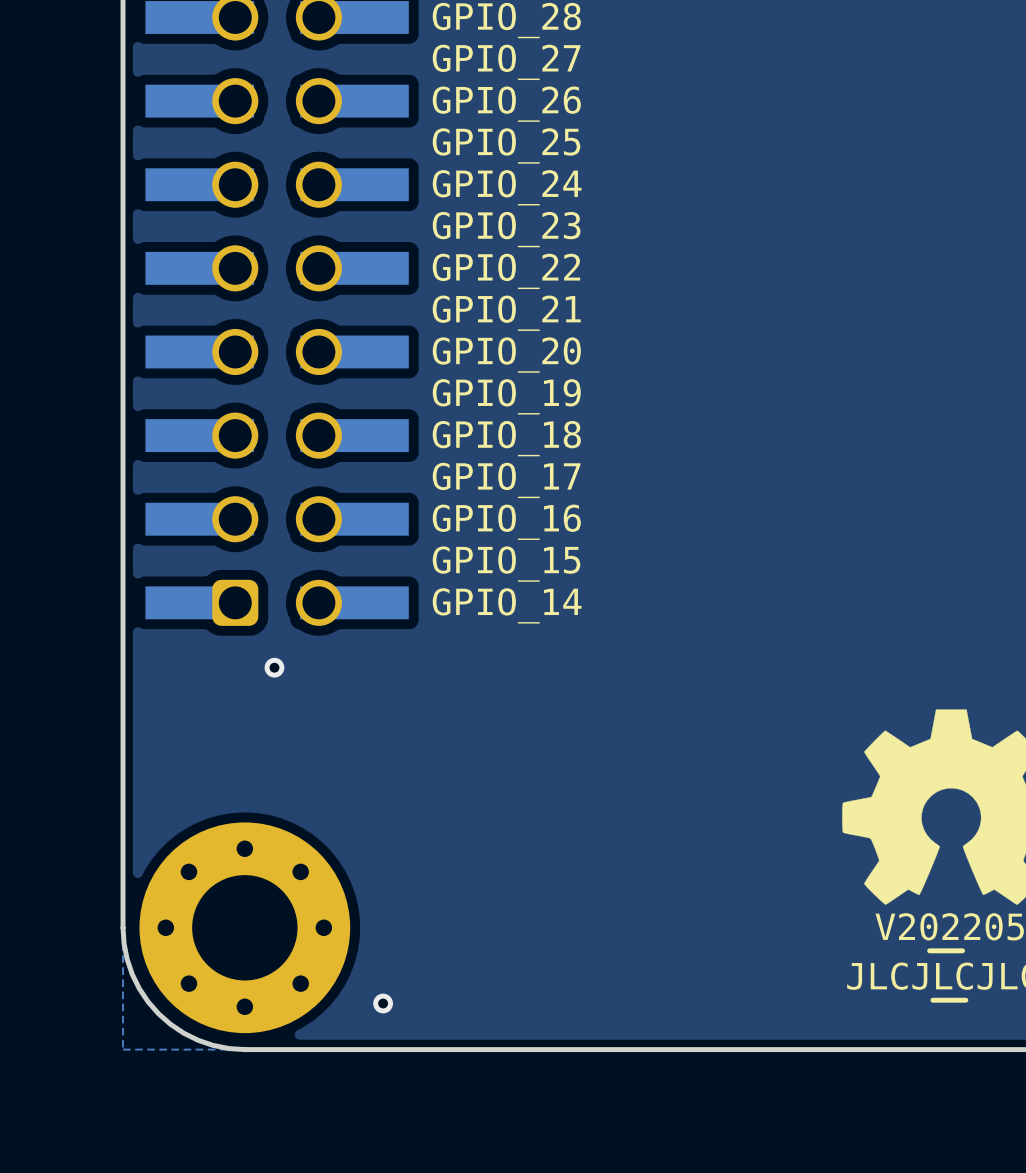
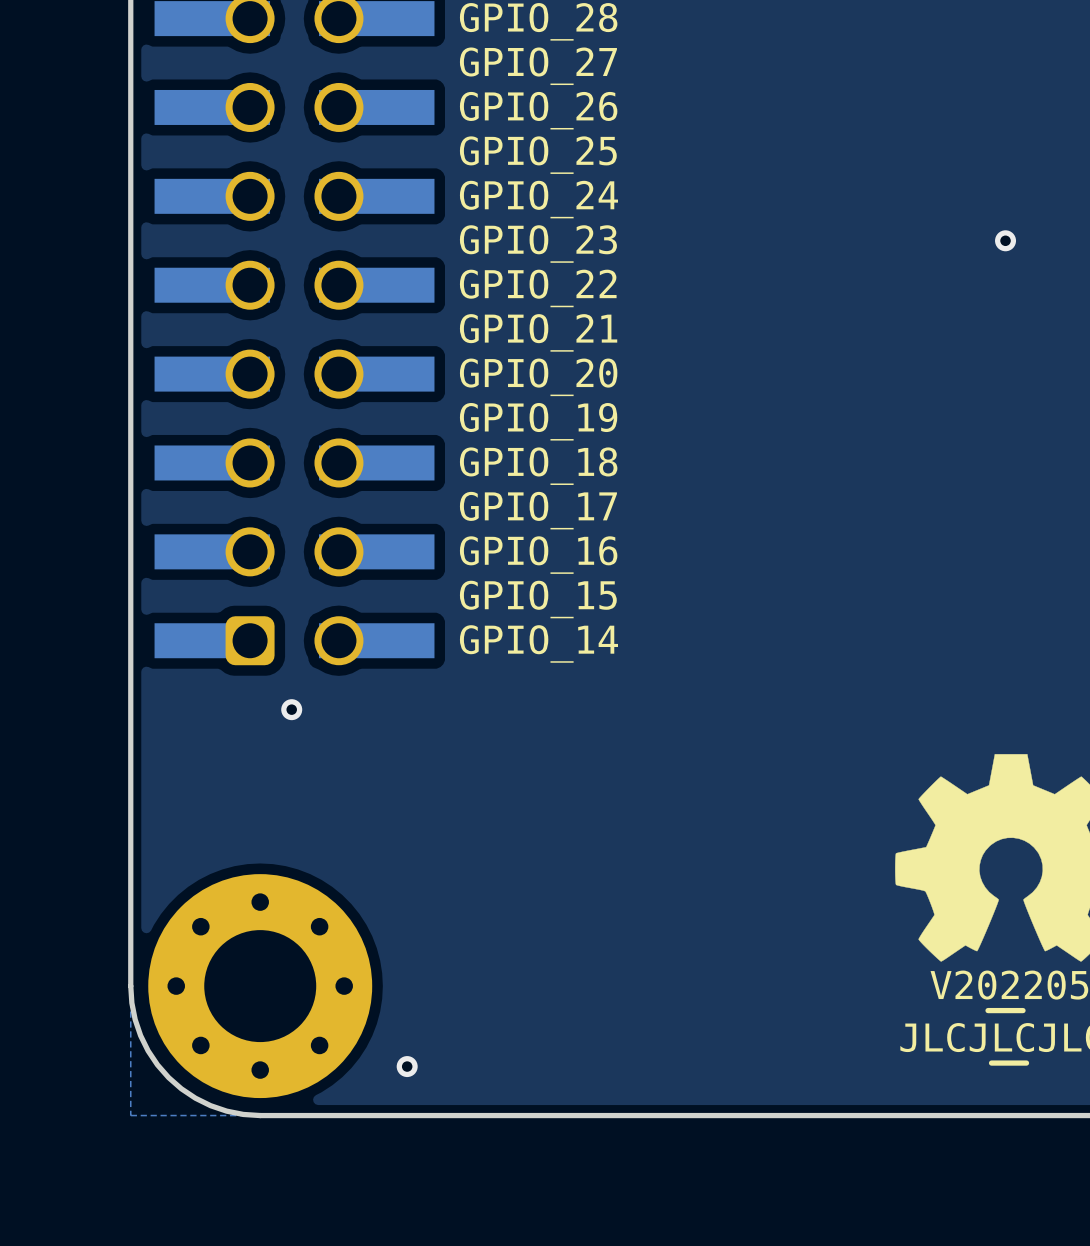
via: none -> (1005, 240)

